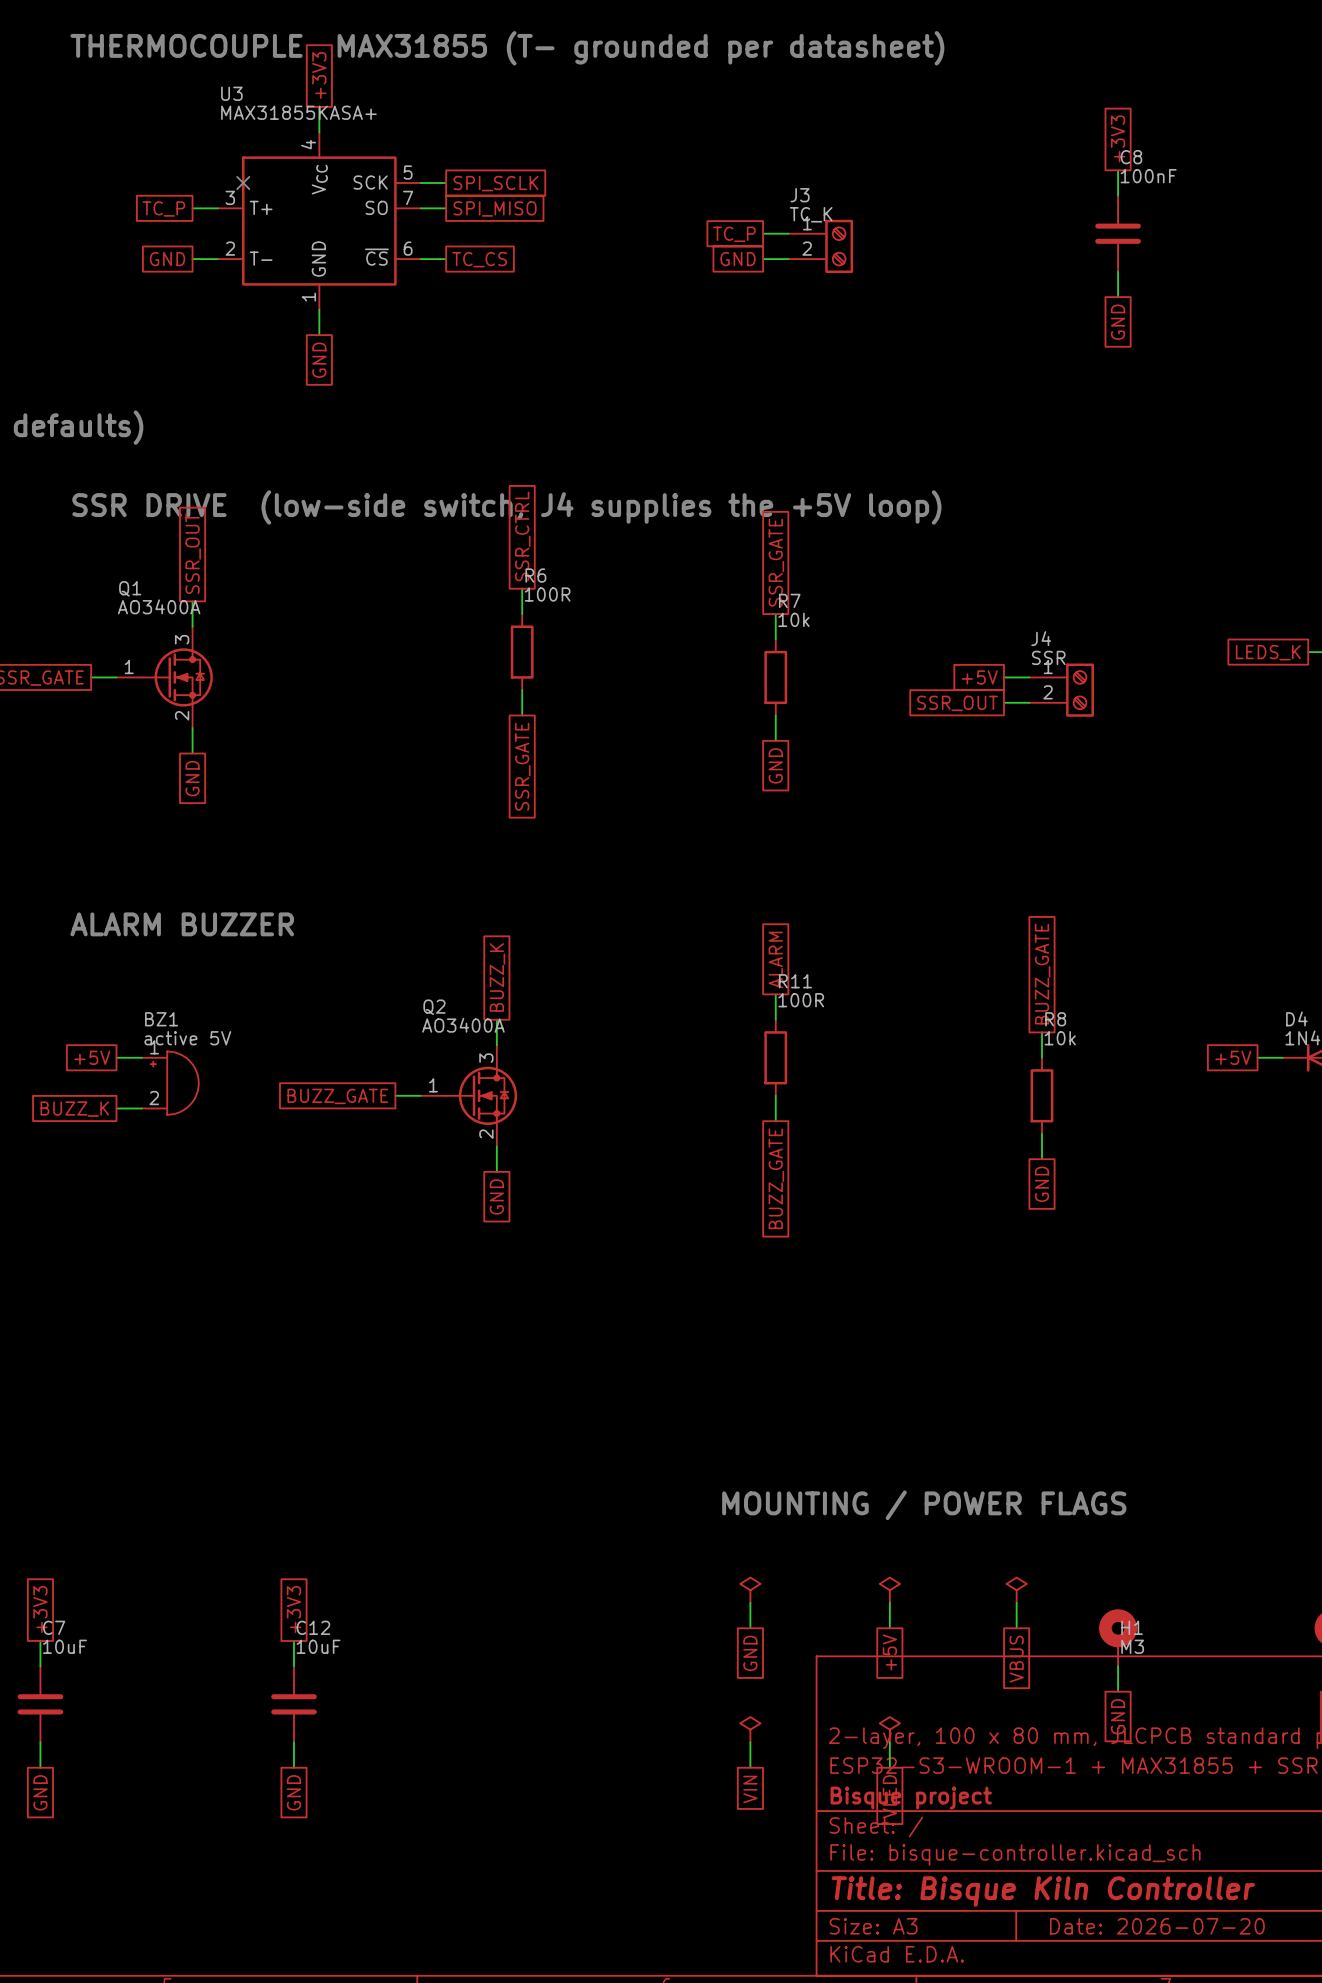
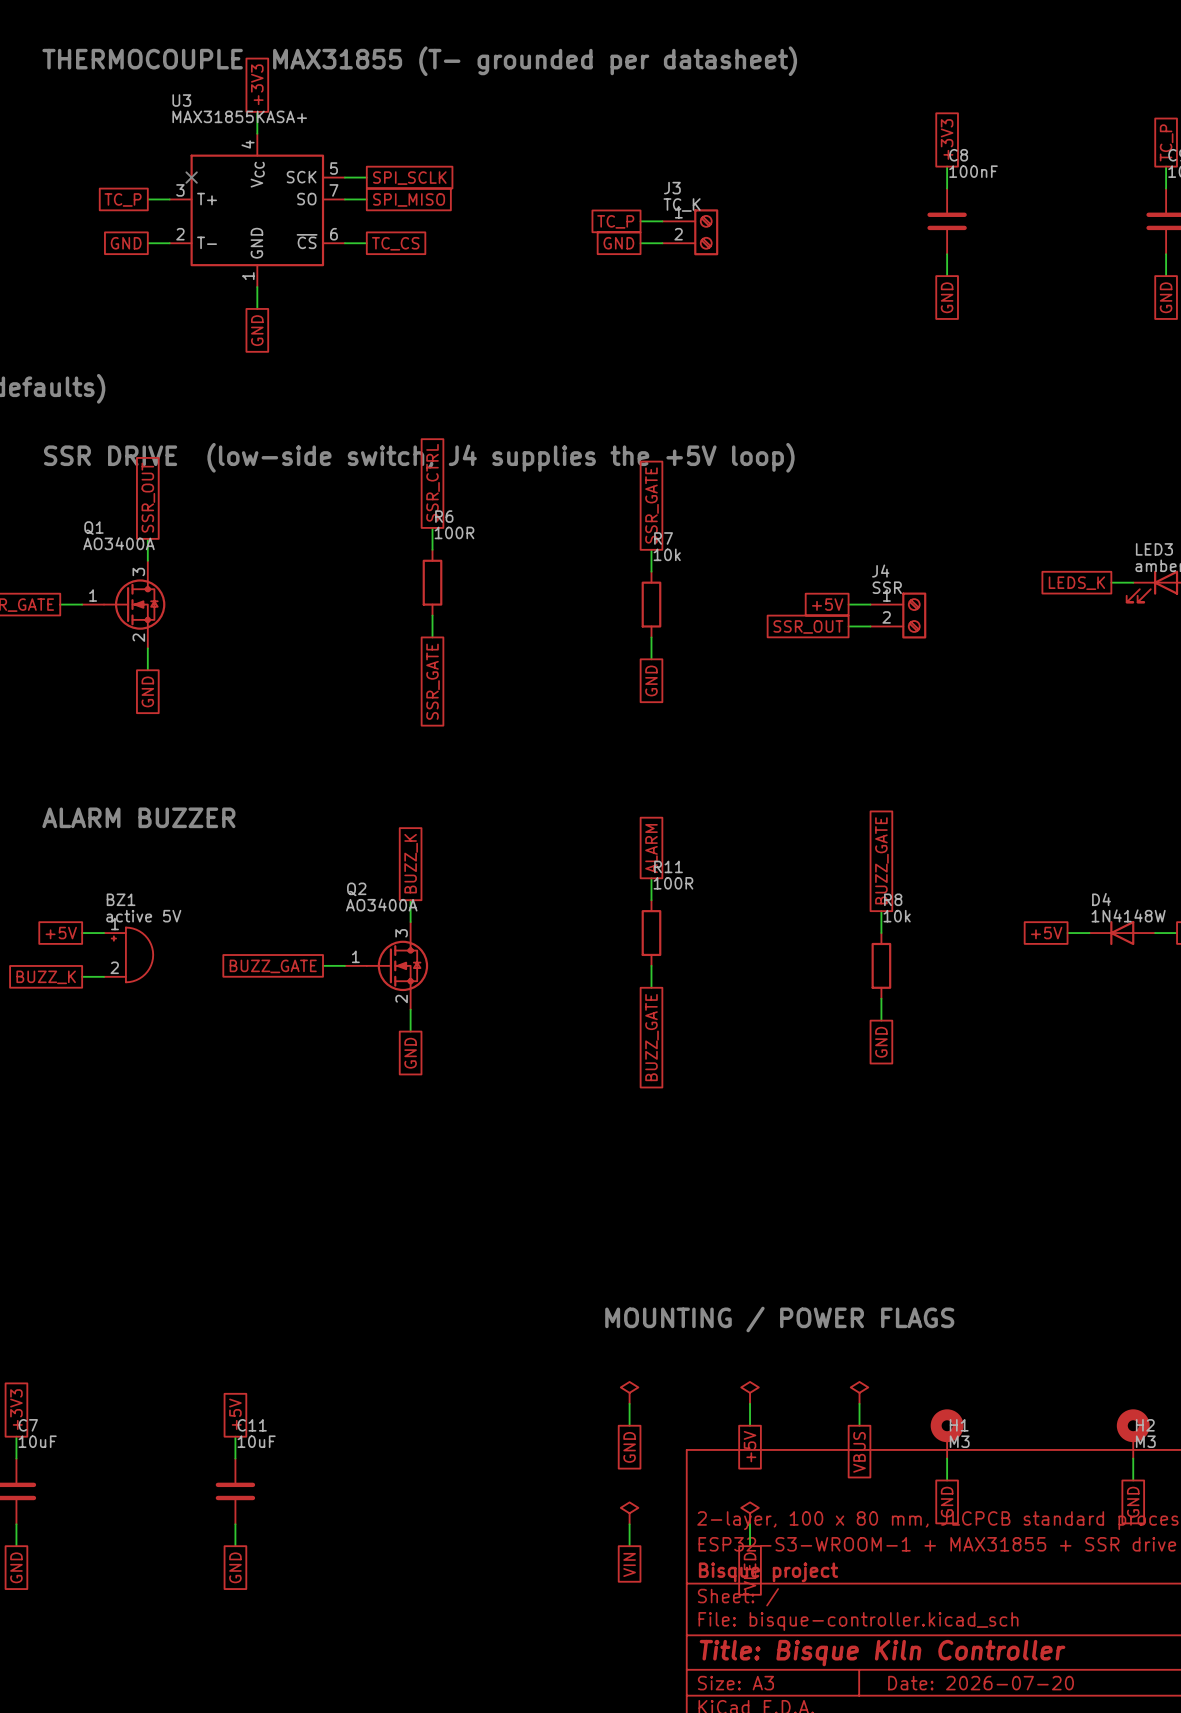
global label: +3V3 (293, 1609) -> +5V (235, 1414)
C12 name: C12 (313, 1627) -> C11 (252, 1425)

